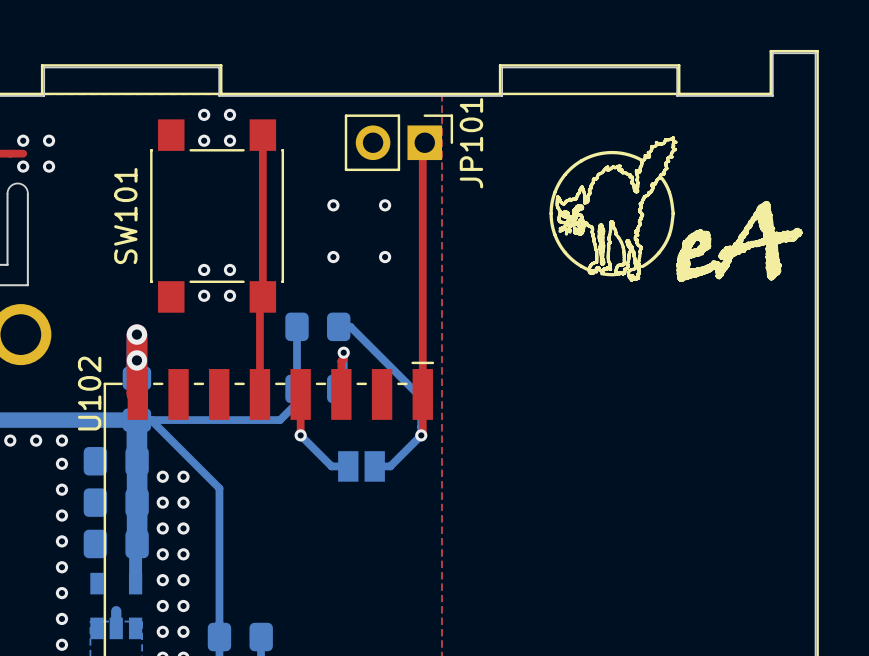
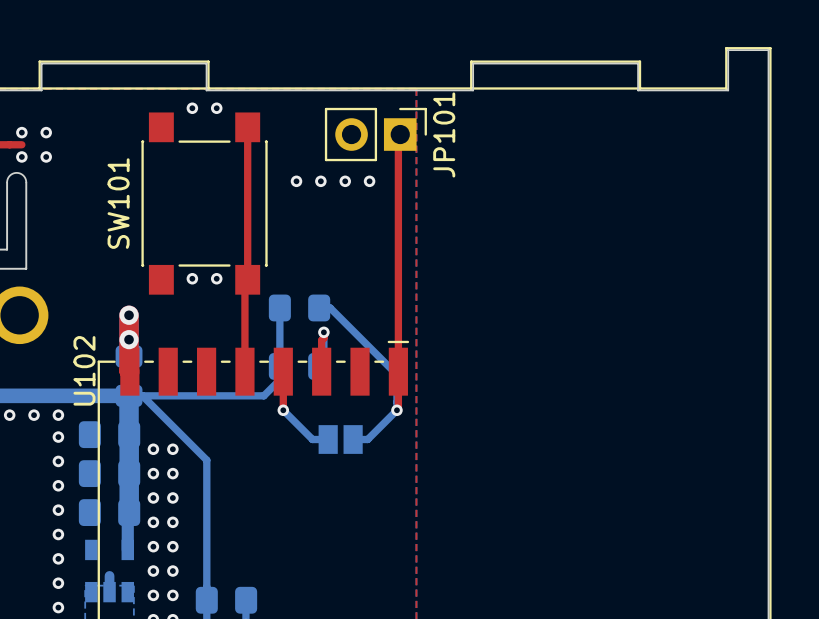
drawing: [549, 136, 803, 282] -> none
via: (204, 140) -> none
via: (229, 140) -> none
via: none -> (296, 181)
via: none -> (320, 181)
via: none -> (345, 181)
via: none -> (369, 181)
via: (333, 205) -> none
via: (385, 205) -> none
via: (333, 257) -> none
via: (385, 257) -> none
via: (204, 269) -> none
via: (229, 269) -> none

